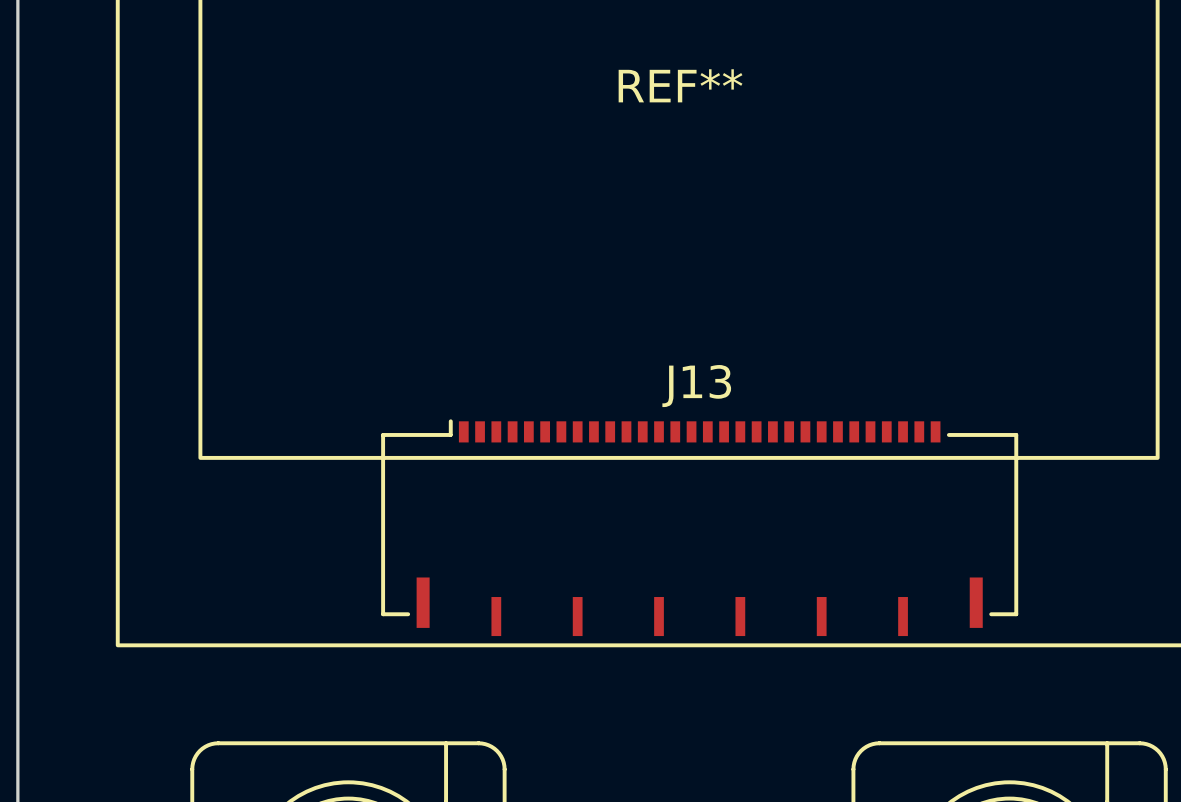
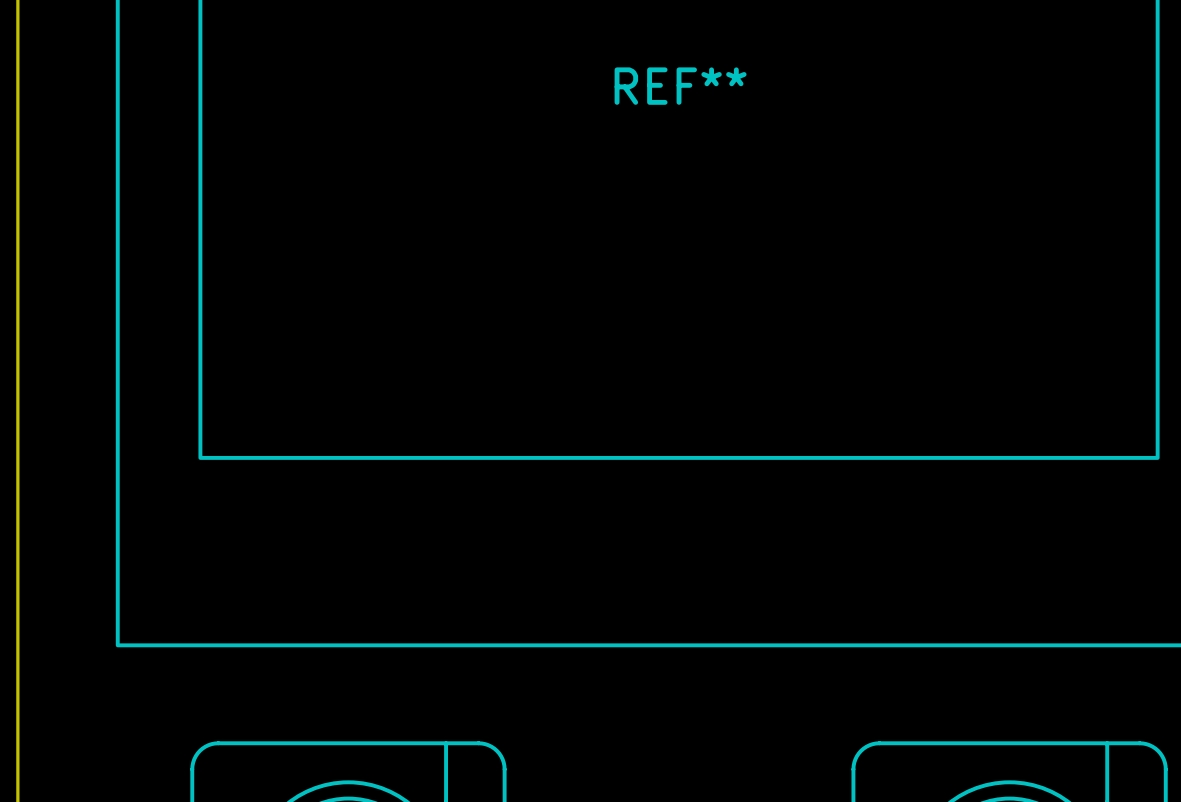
J13: (699, 527) -> none

